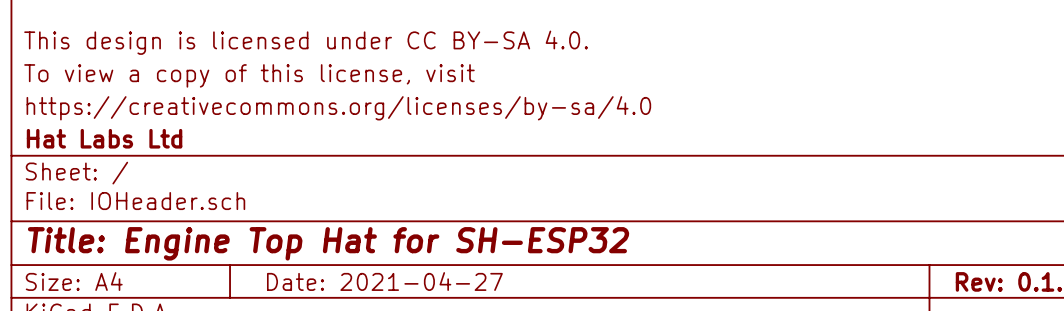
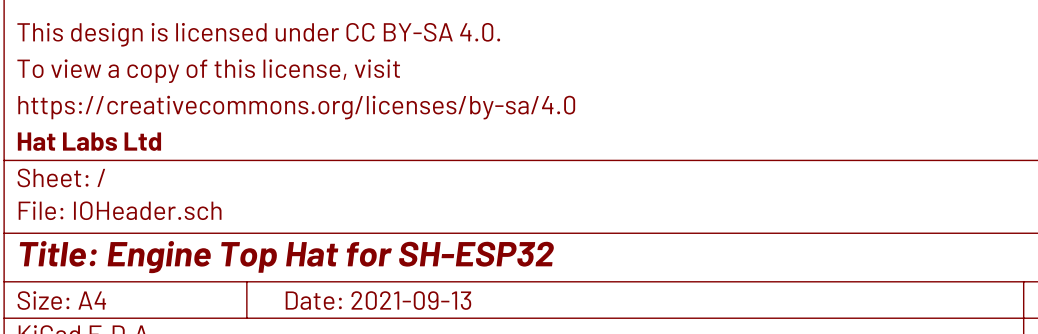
title block: Date: 2021-04-27 (384, 281) -> Date: 2021-09-13 (378, 300)

